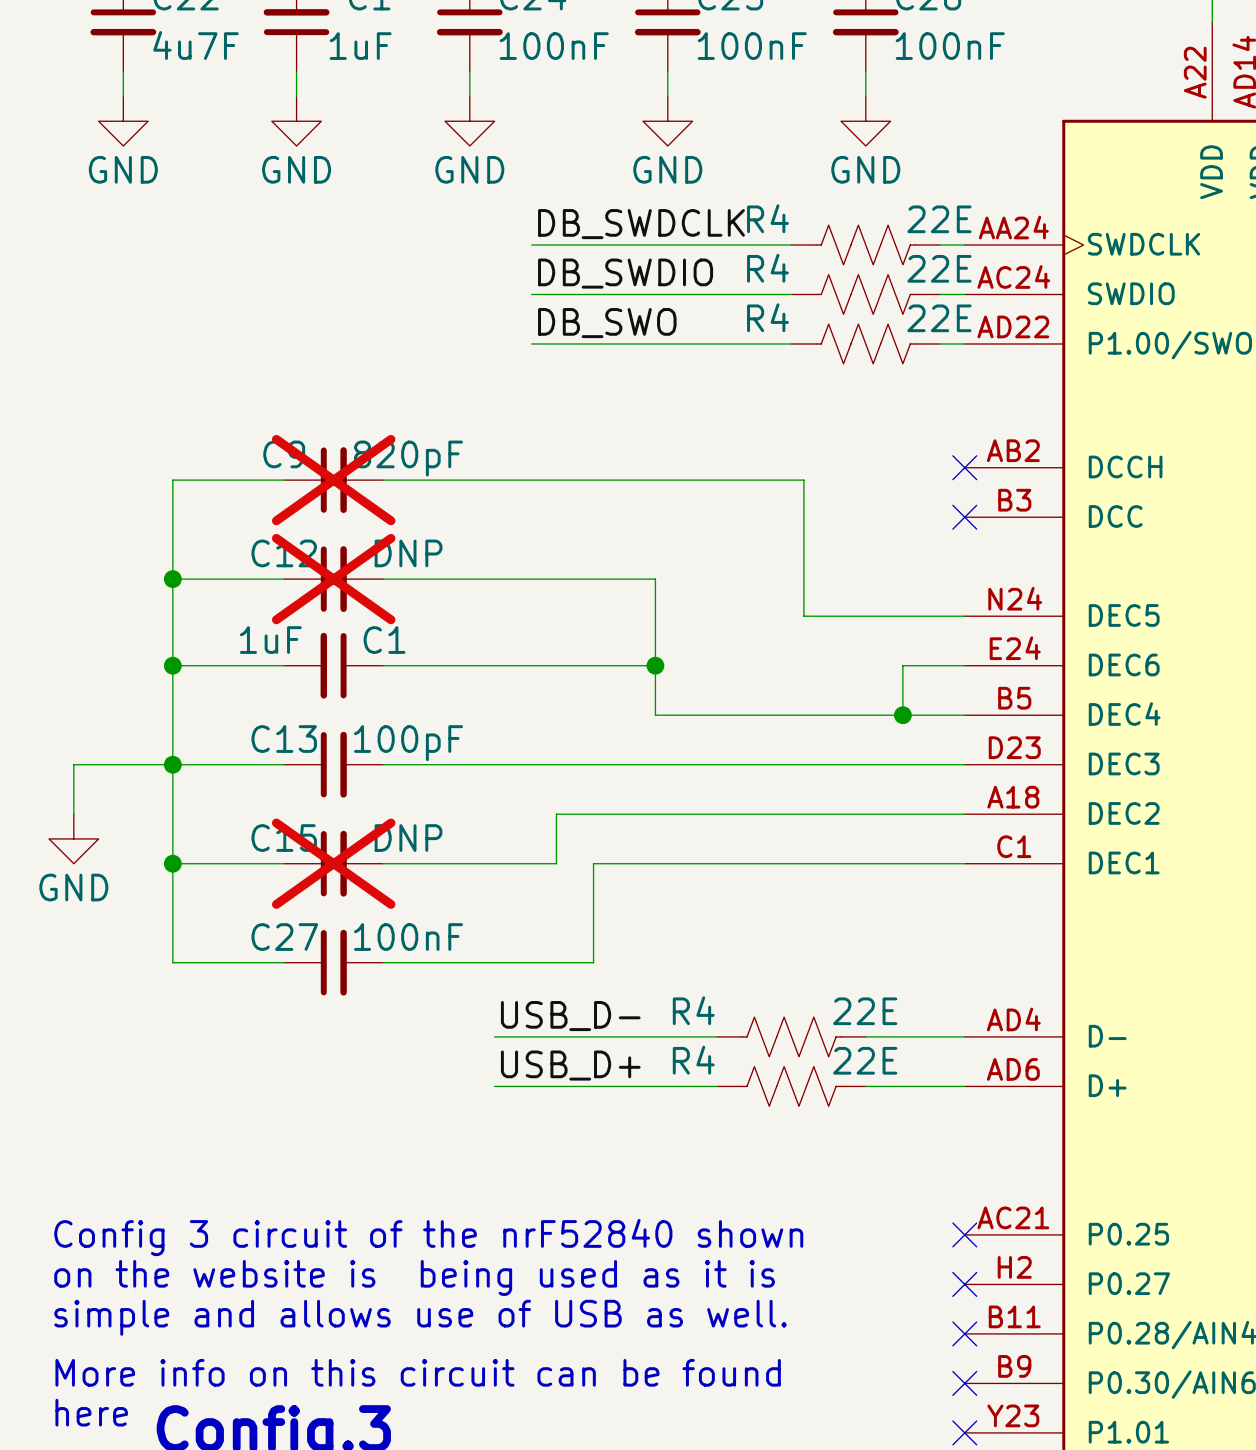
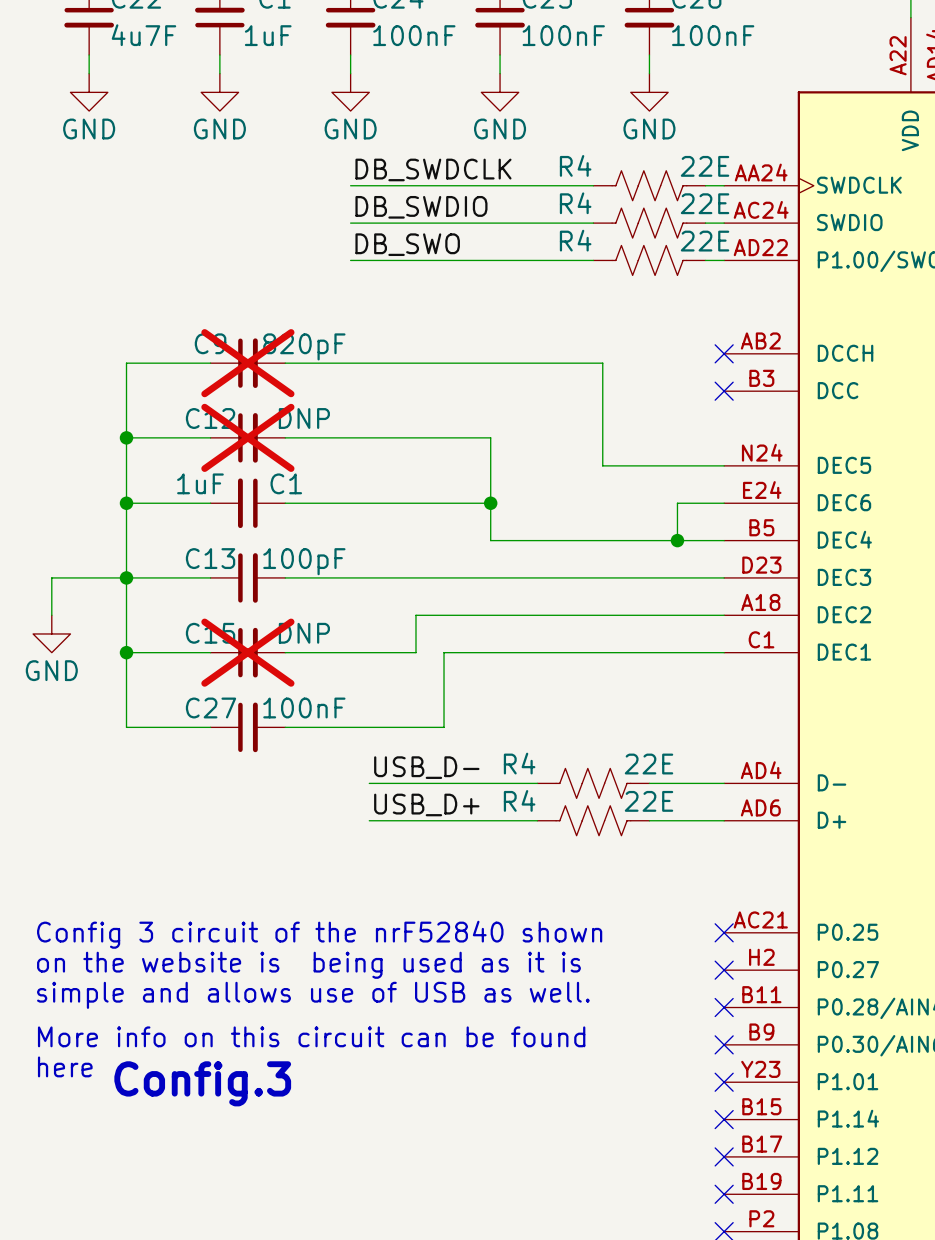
label position: DB_SWDCLK (641, 224) -> DB_SWDCLK (433, 169)
wire: none -> (350, 185) (397, 185)
label position: DB_SWDIO (625, 273) -> DB_SWDIO (421, 207)
wire: none -> (350, 223) (397, 223)
label position: DB_SWO (607, 323) -> DB_SWO (407, 244)
wire: none -> (350, 260) (397, 260)

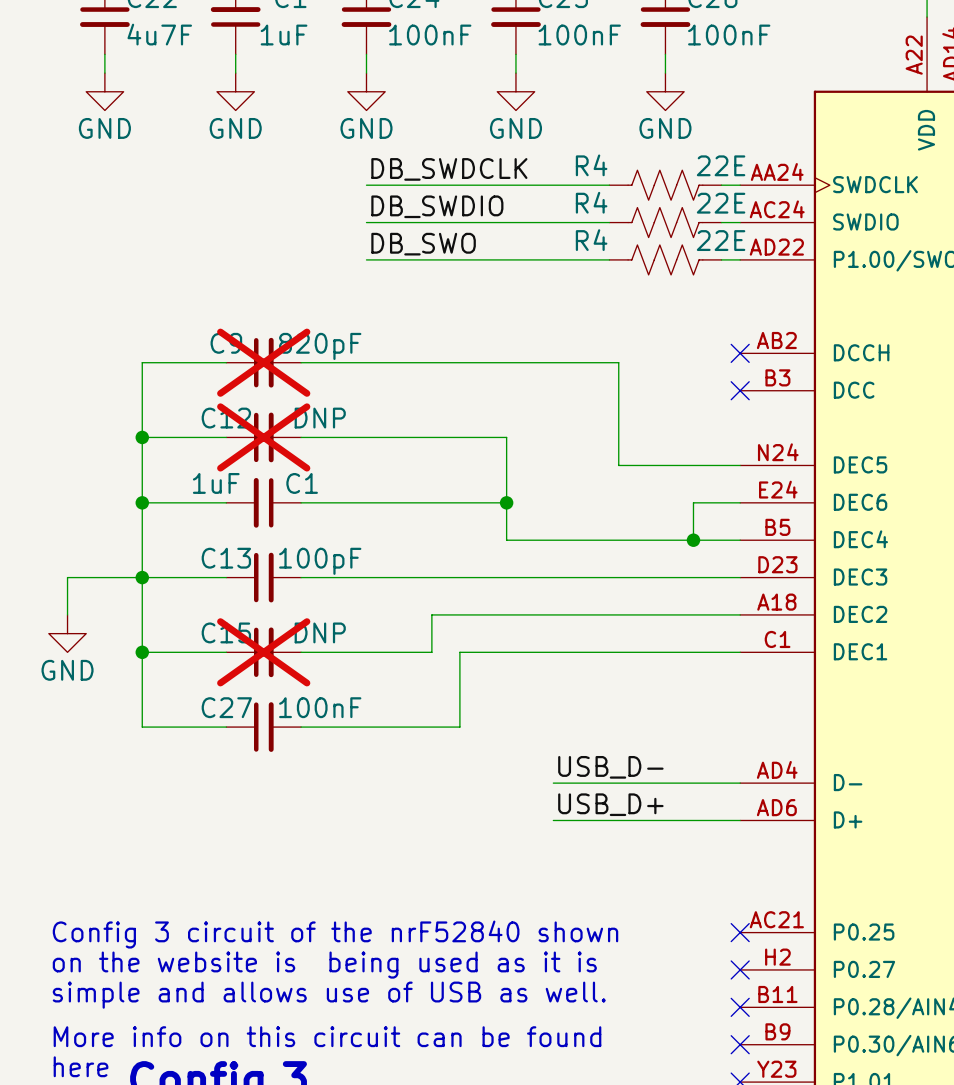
label position: USB_D- (426, 767) -> USB_D- (610, 767)
wire: (369, 783) (537, 783) -> (665, 783) (553, 783)
R4: 22E (593, 783) -> none
label position: USB_D+ (426, 804) -> USB_D+ (610, 804)
wire: (369, 820) (537, 820) -> (665, 820) (553, 820)
R4: 22E (593, 820) -> none

